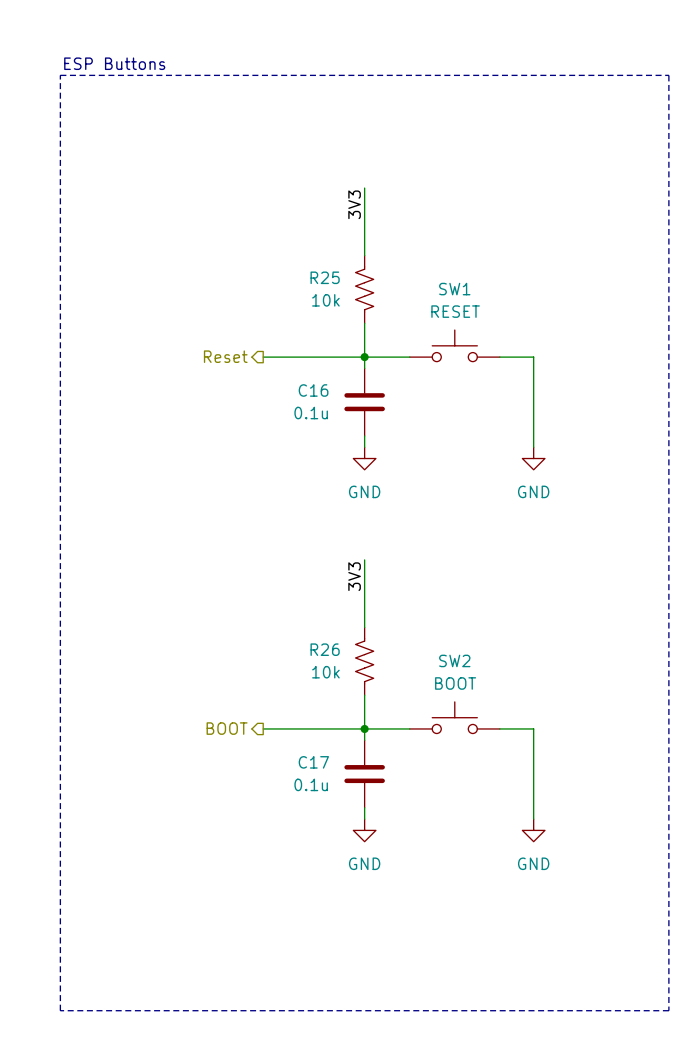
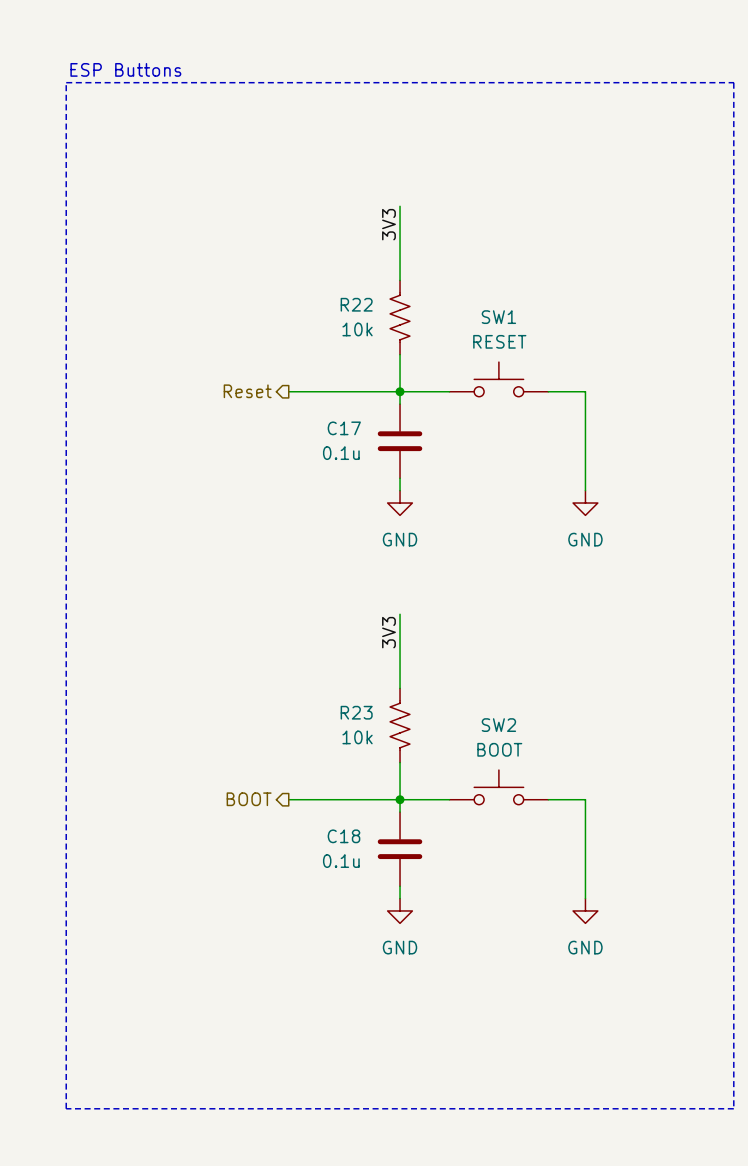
R25 name: R25 (325, 277) -> R22 (356, 304)
C16 name: C16 (313, 390) -> C17 (344, 428)
R26 name: R26 (325, 649) -> R23 (356, 712)
C17 name: C17 (313, 762) -> C18 (343, 836)

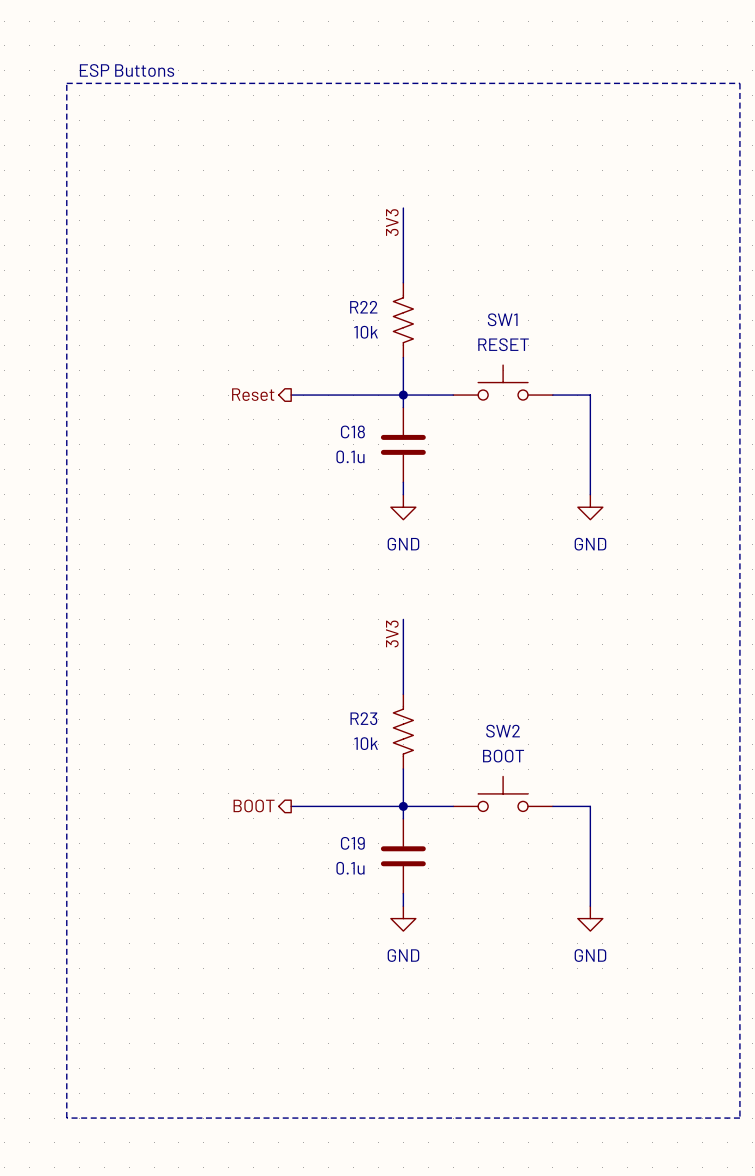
C17 name: C17 (344, 428) -> C18 (352, 431)
C18 name: C18 (343, 836) -> C19 (352, 843)

